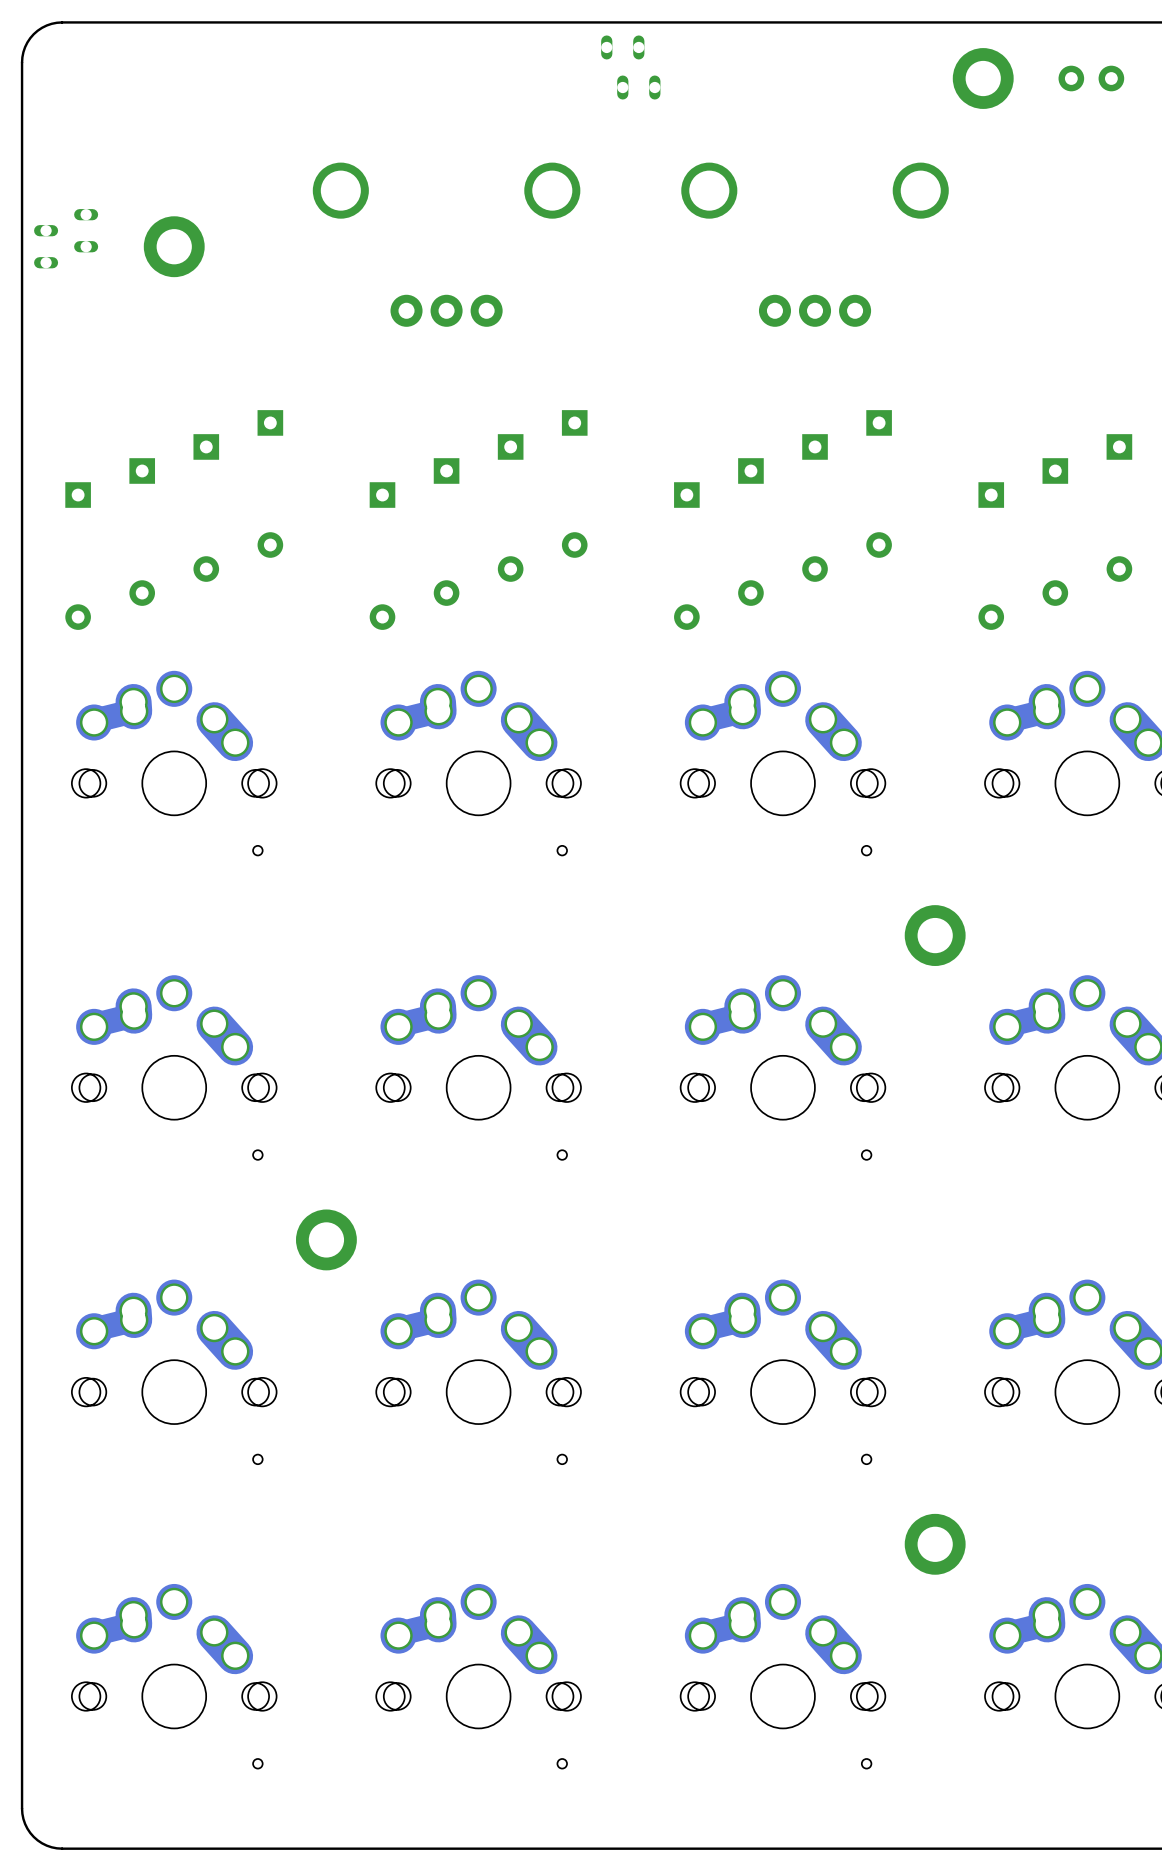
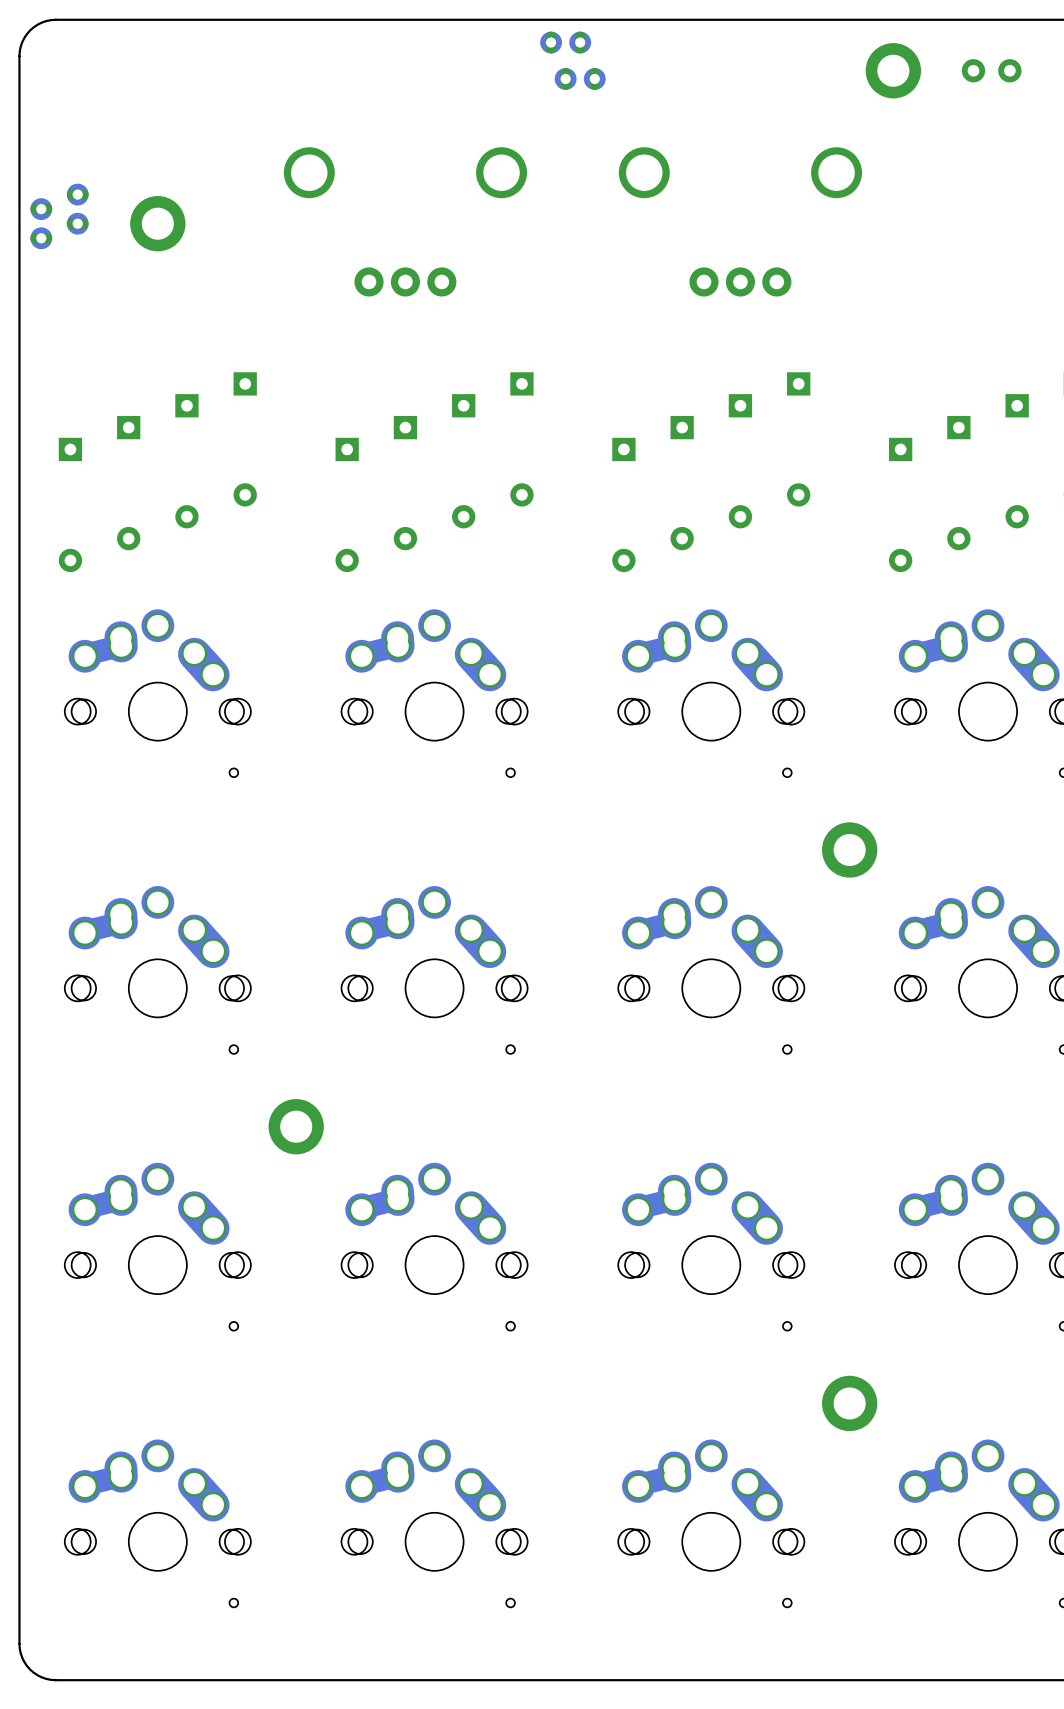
part footprint: [601, 35, 661, 100] -> [540, 31, 606, 90]
part footprint: [34, 209, 99, 269] -> [30, 183, 89, 250]

